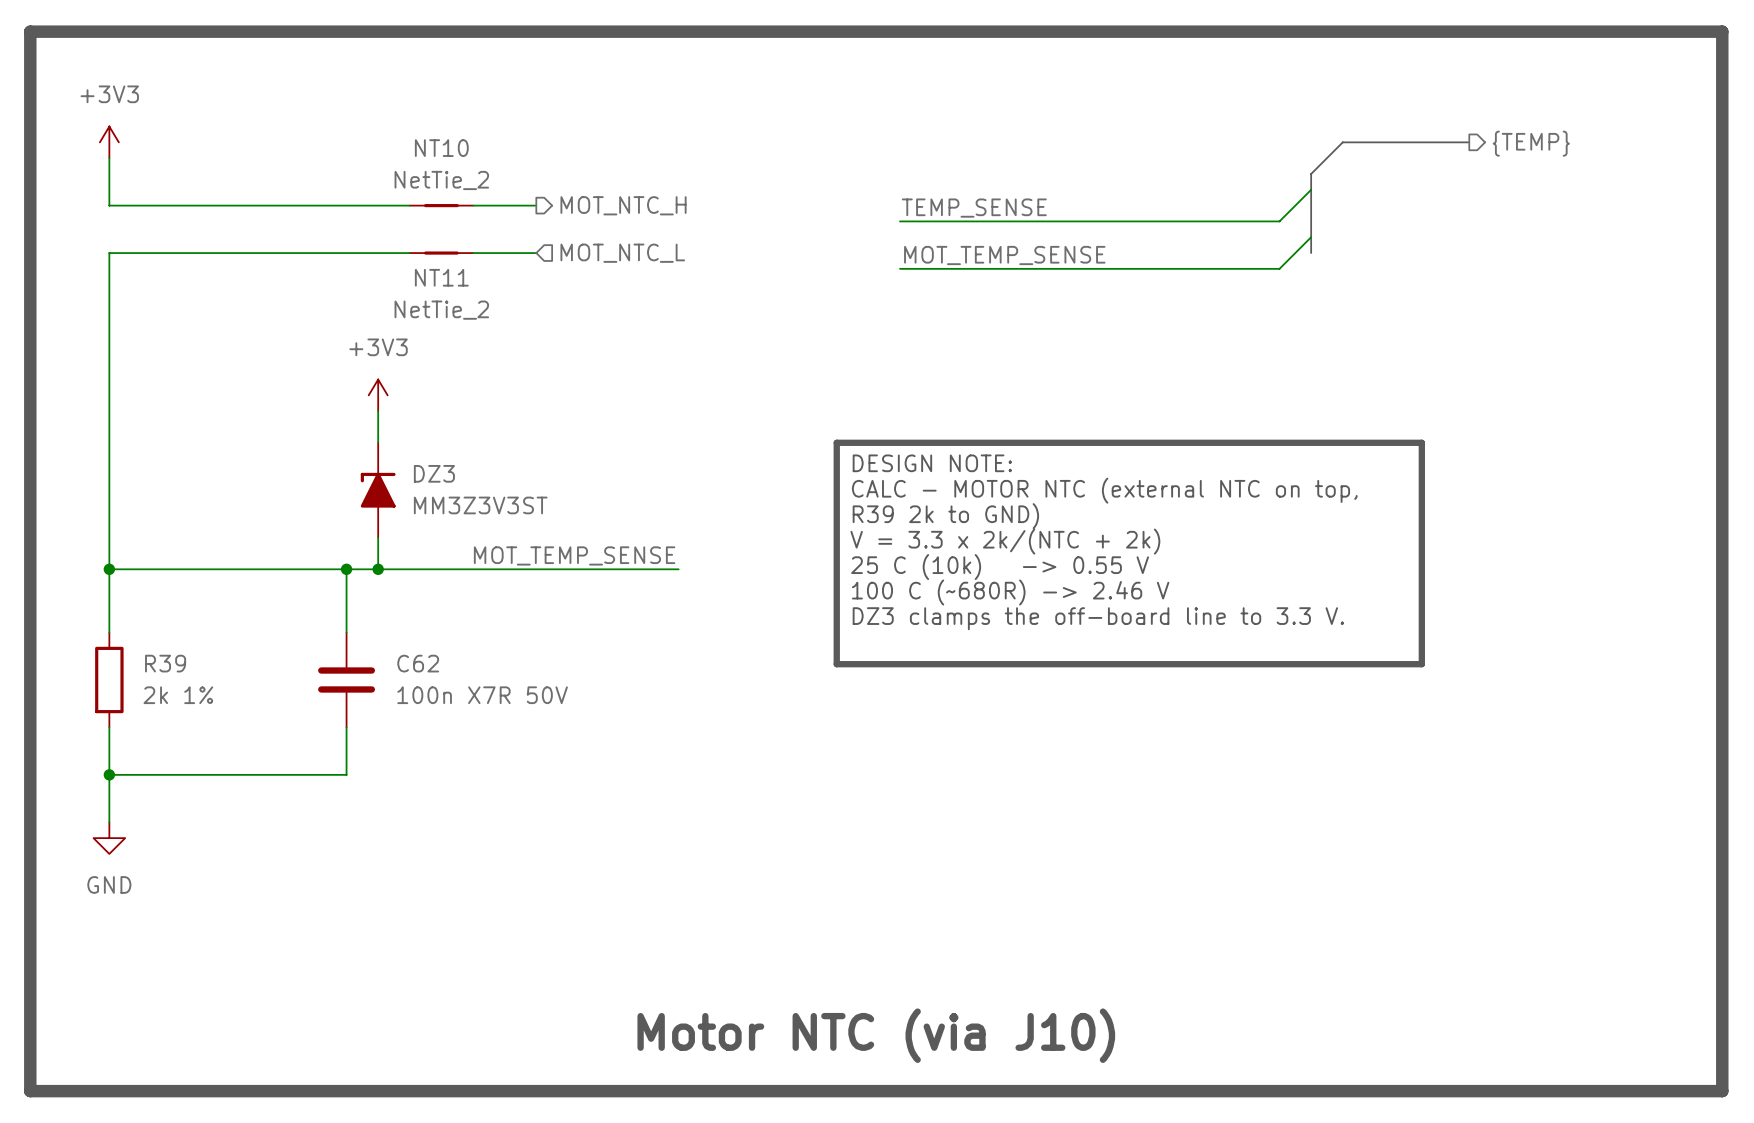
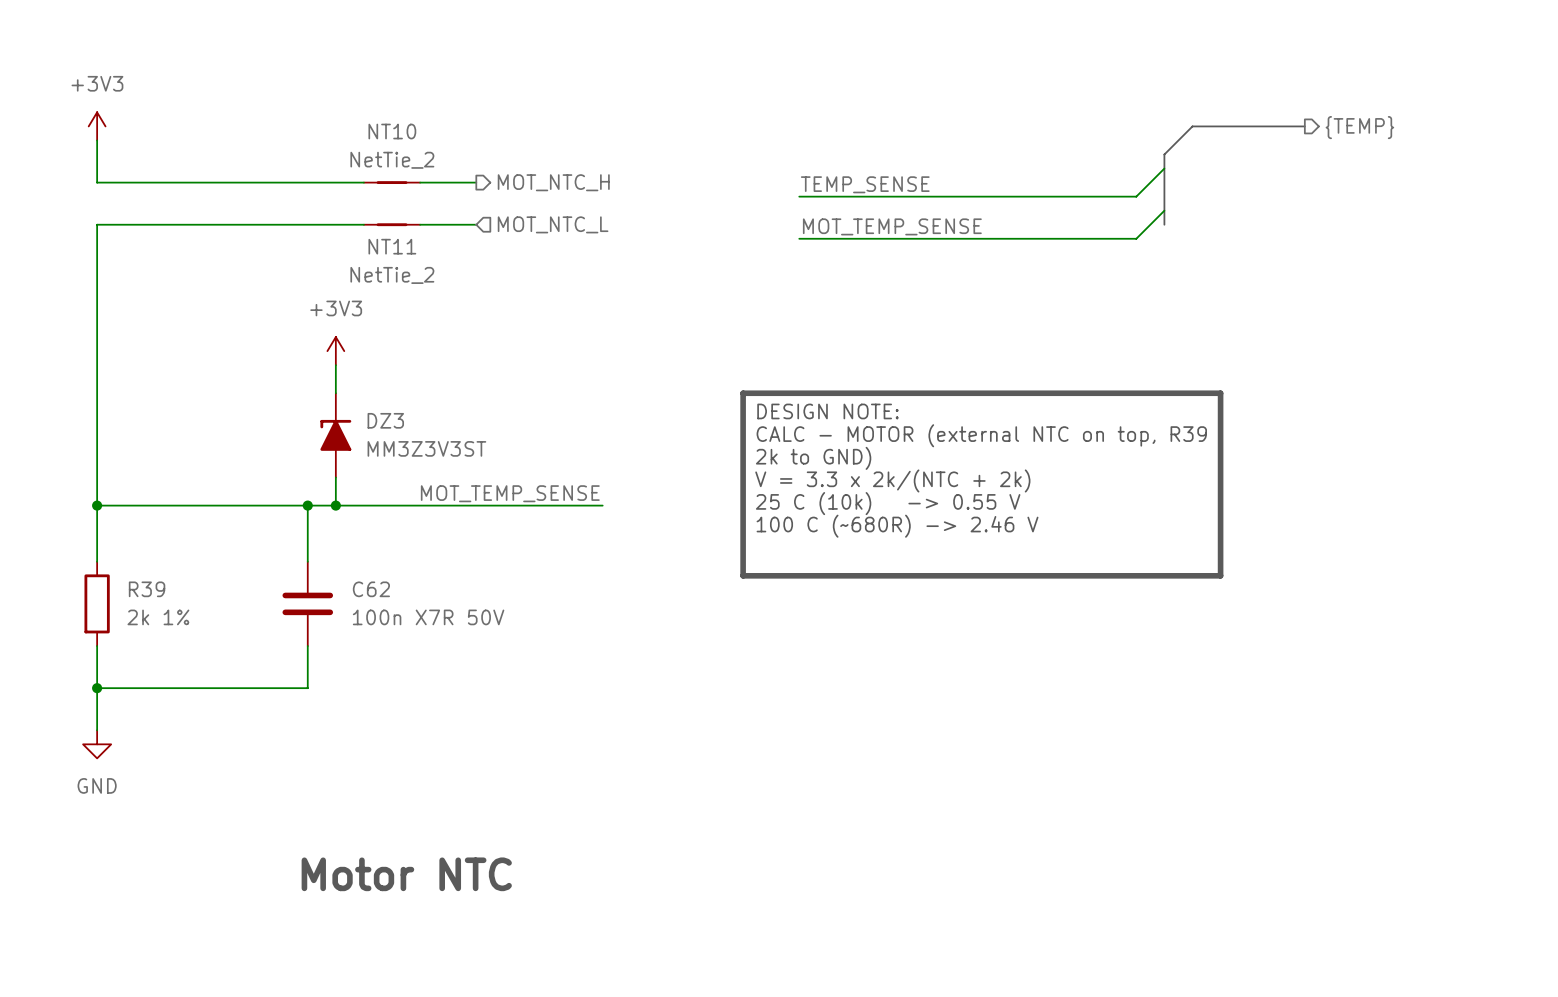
line: (30, 31) (1722, 31) (1722, 1091) (30, 1091) (30, 31) -> none
line: (1374, 442) (1421, 442) (1421, 664) (836, 664) (836, 648) -> (1220, 393) (1220, 575) (743, 575)
text: CALC - MOTOR NTC (external NTC on top, (1104, 490) -> CALC - MOTOR (external NTC on top, R39 (981, 435)
text: R39 2k to GND) (945, 516) -> 2k to GND) (813, 458)
text: DZ3 clamps the off-board line to 3.3 V. (1098, 618) -> none
text: none -> Motor NTC (406, 874)
text: Motor NTC (via J10) (876, 1035) -> none

